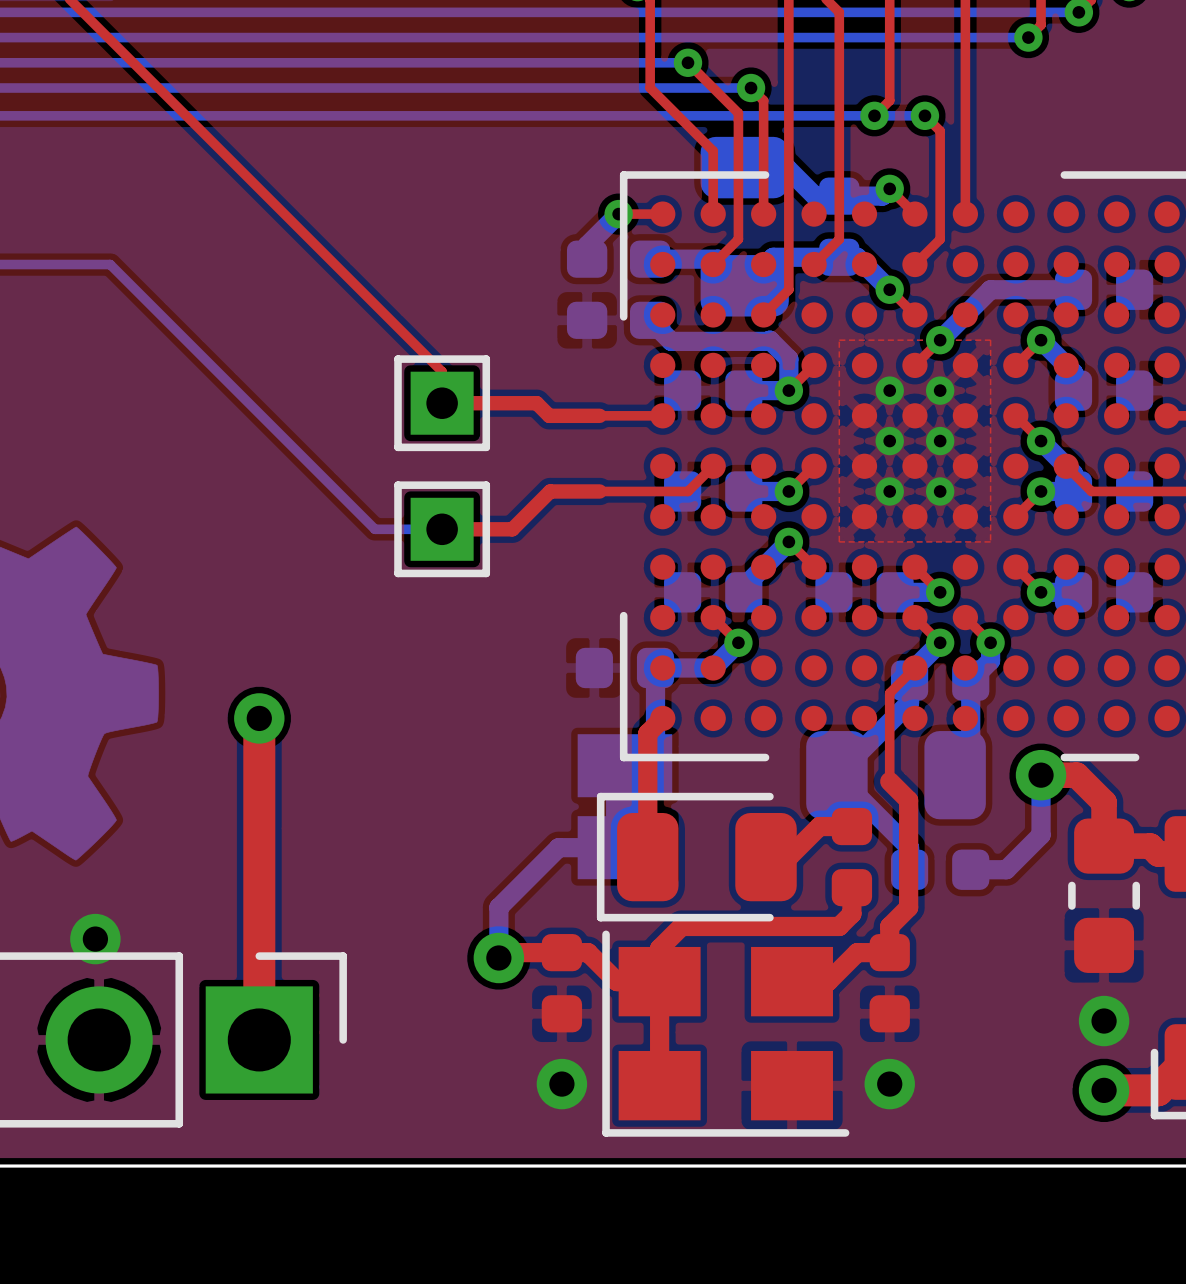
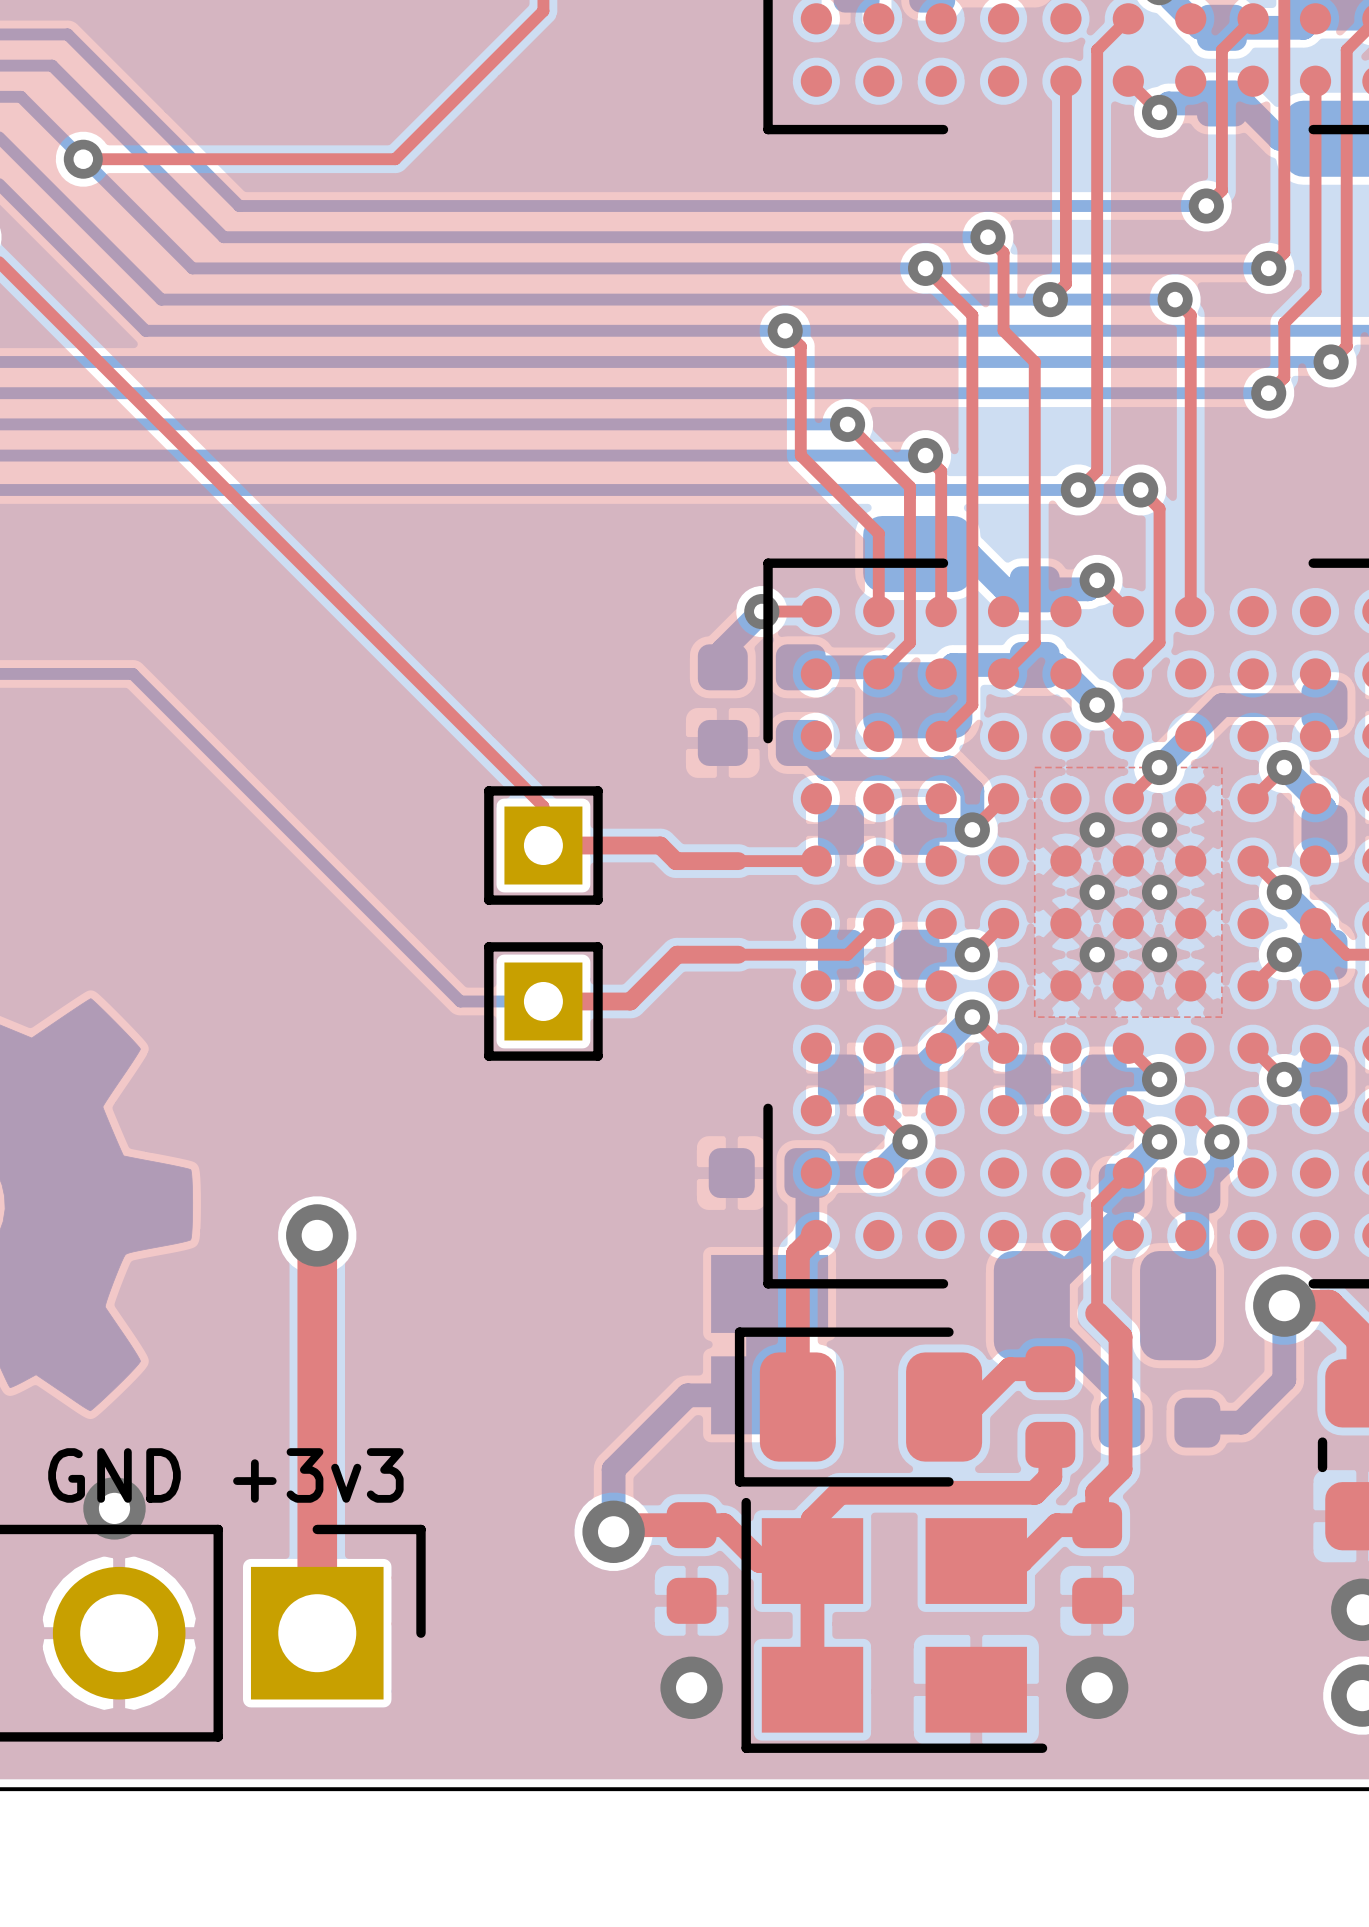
text: none -> GND (114, 1475)
text: none -> +3v3 (318, 1475)

